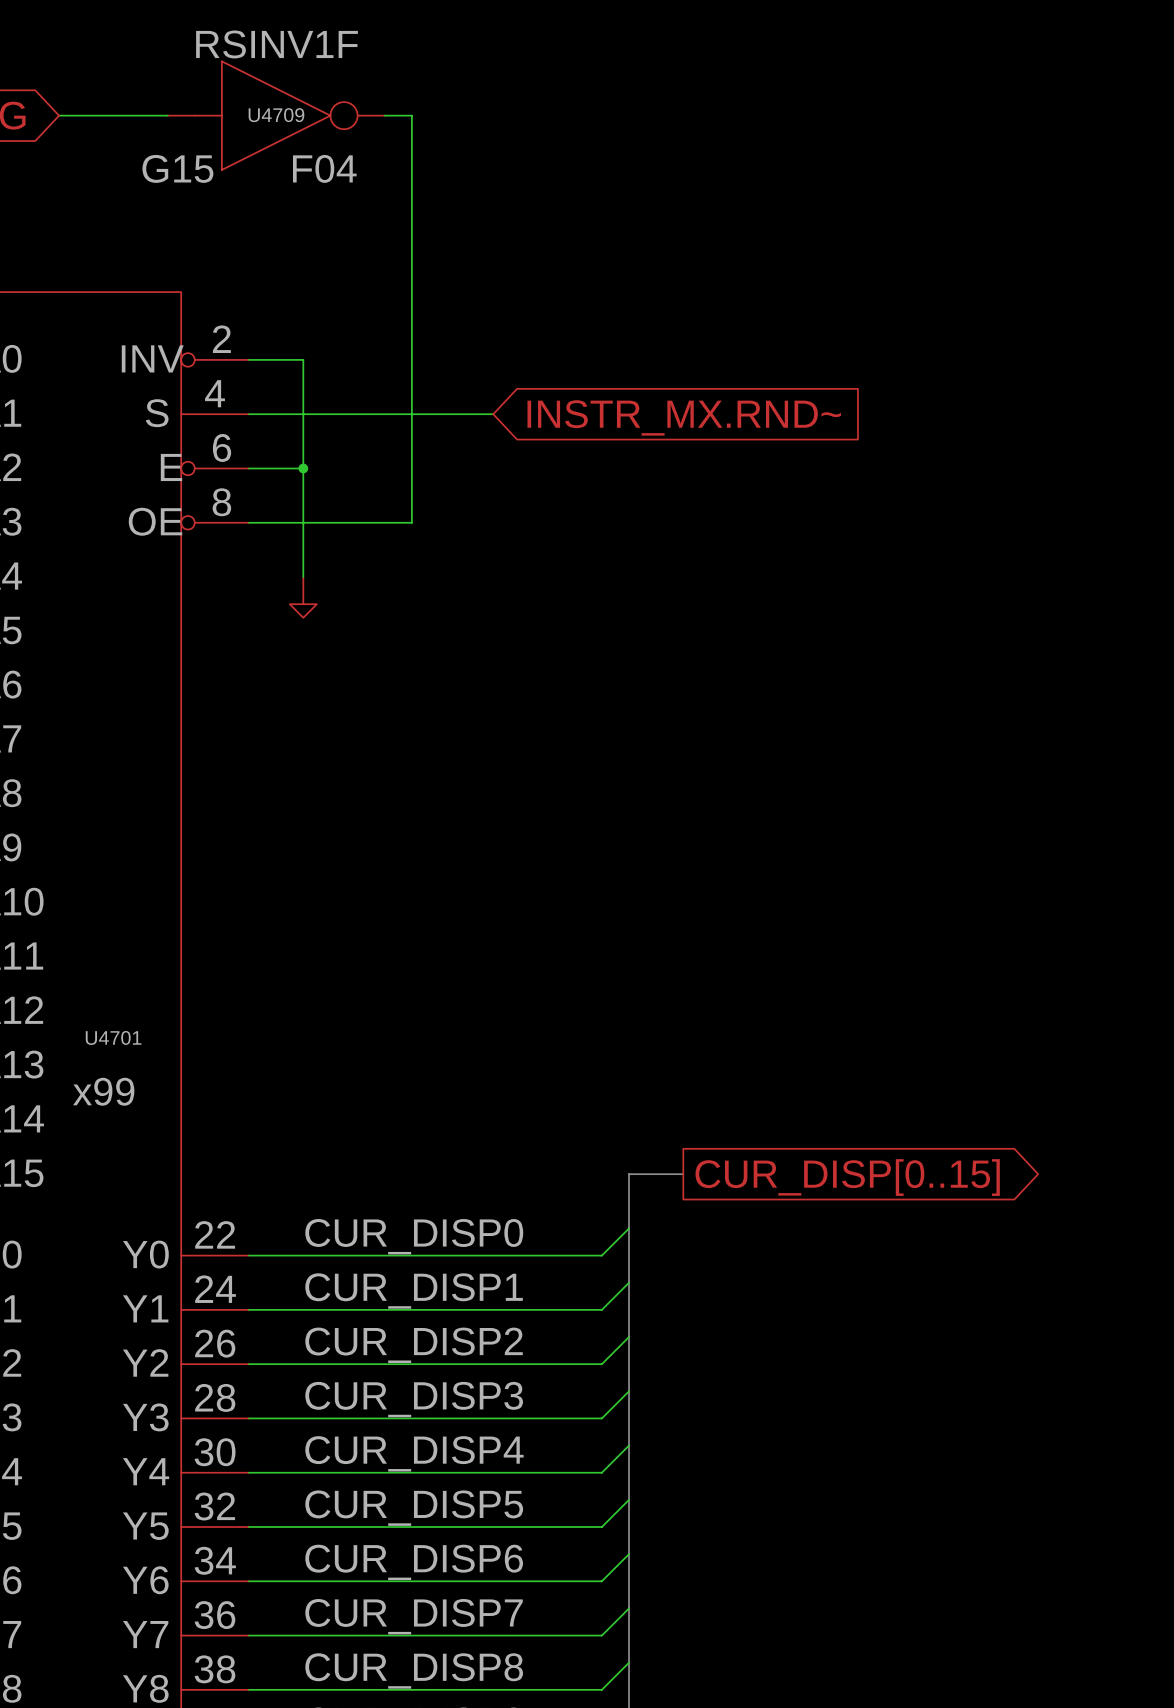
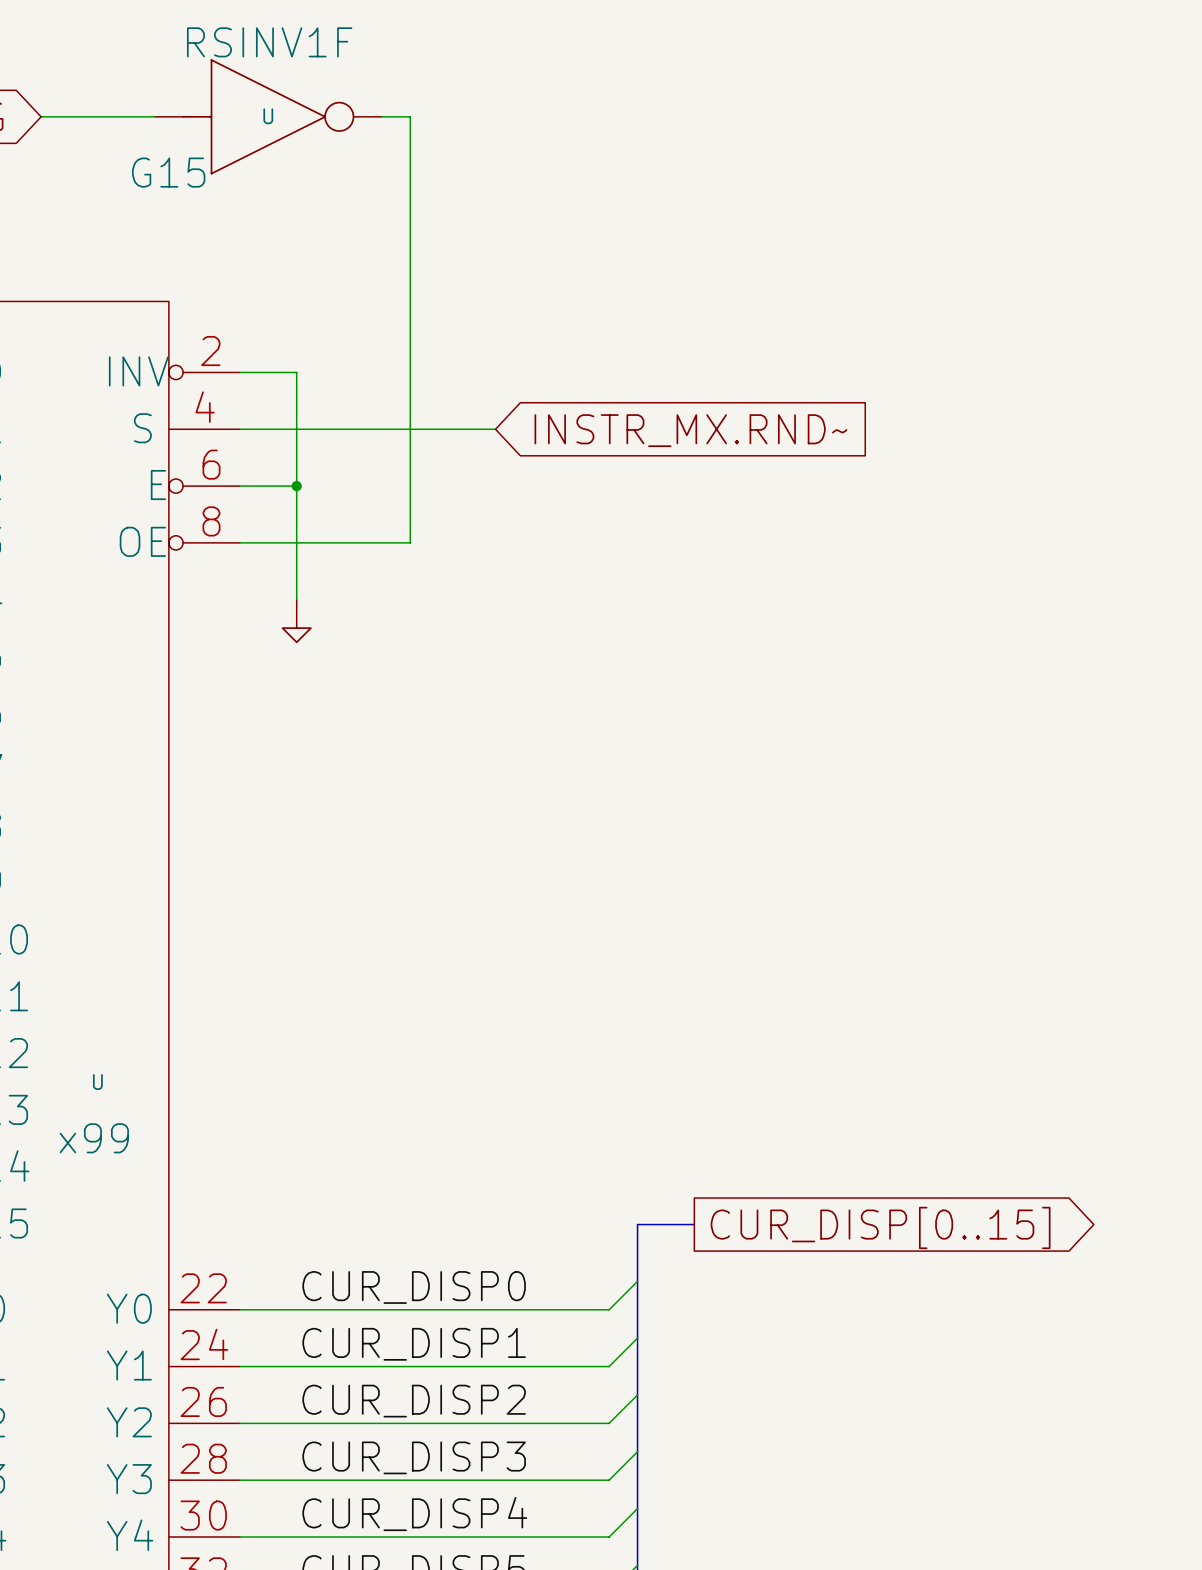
U4709 name: U4709 (276, 115) -> U (268, 116)
U4709 value: F04 (324, 168) -> none
U4701 name: U4701 (113, 1037) -> U (97, 1082)

